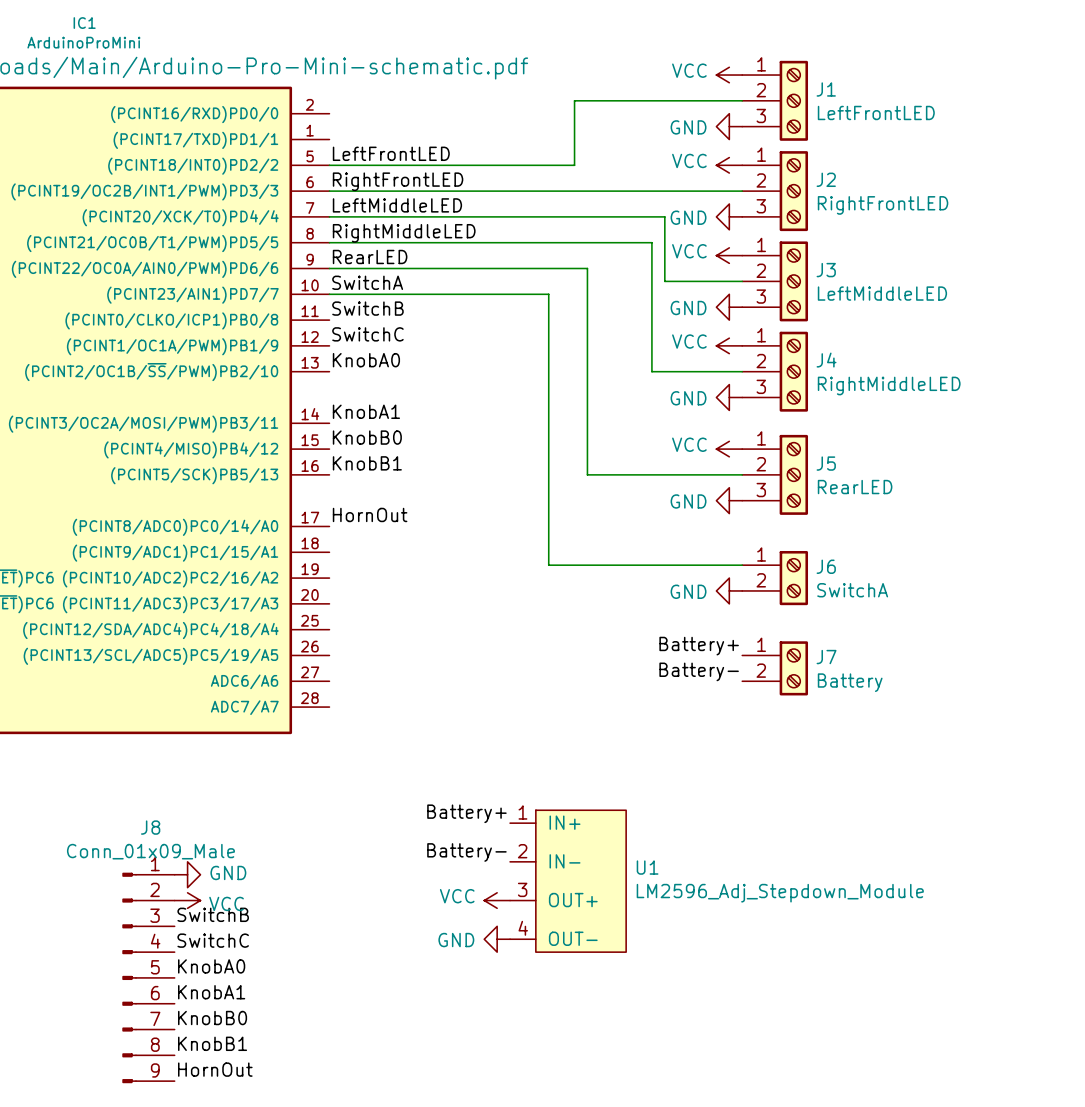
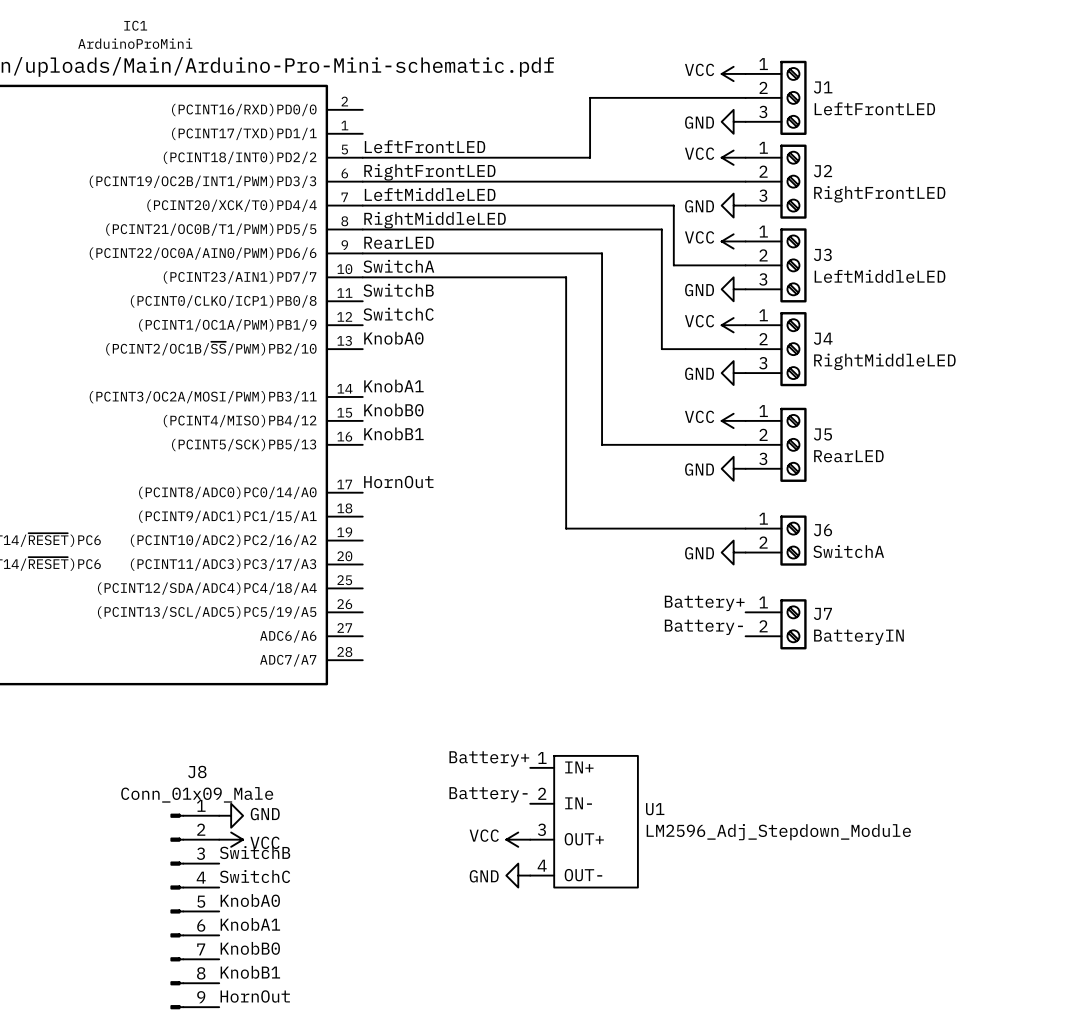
J7 value: Battery (850, 682) -> BatteryIN (858, 637)

